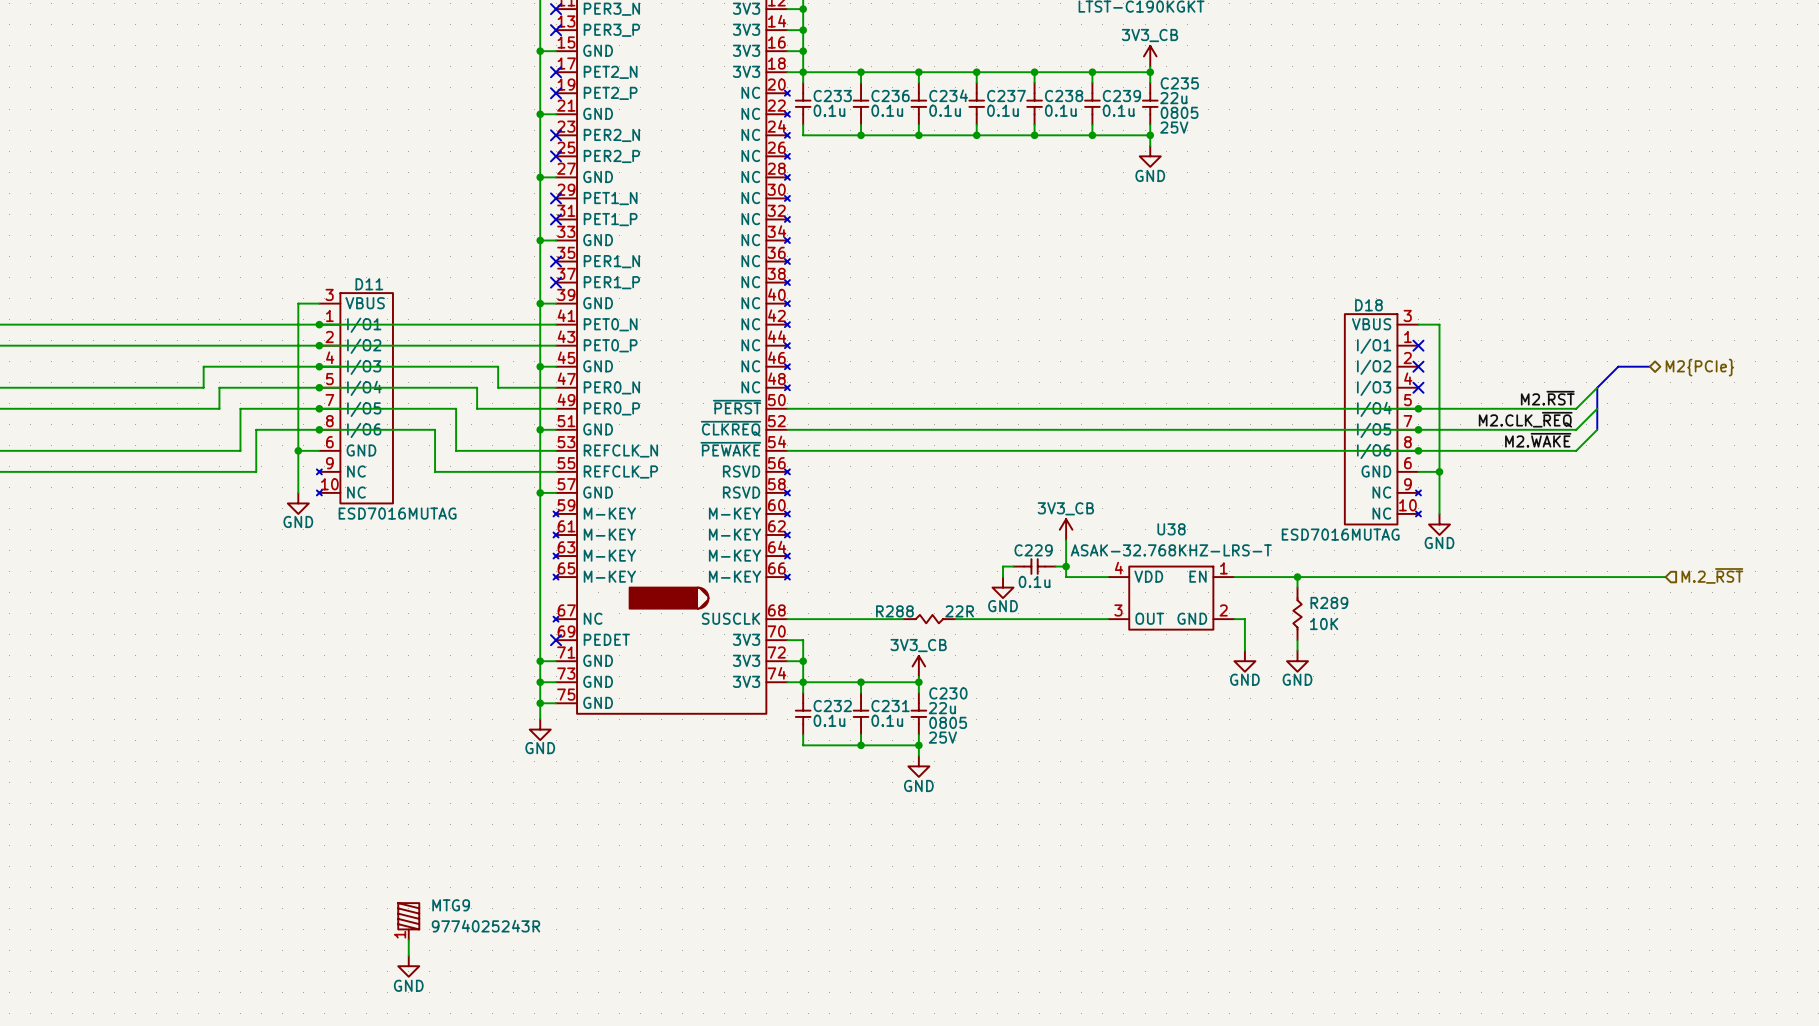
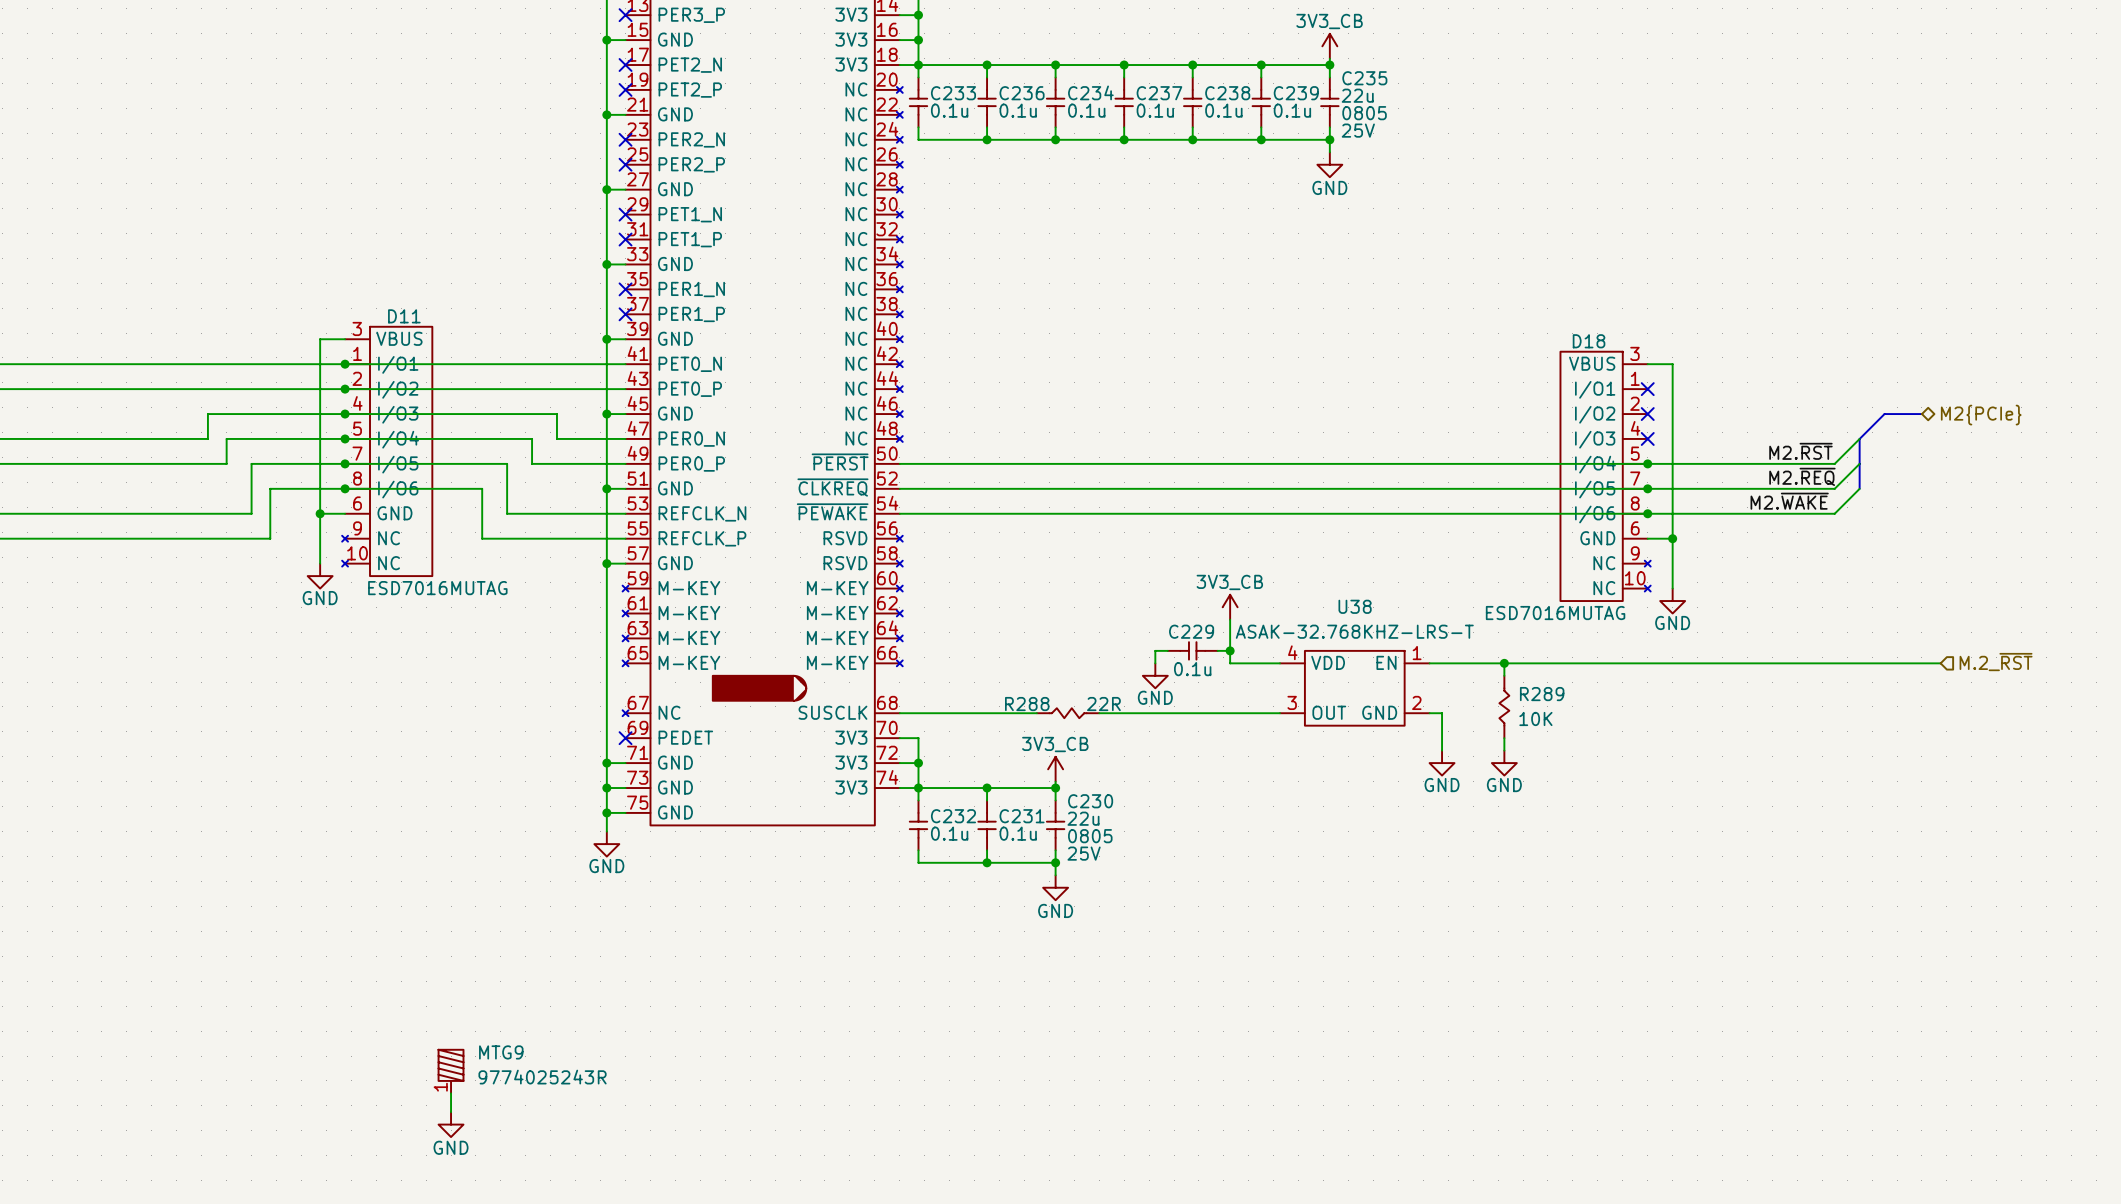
label: M2.CLK_~{REQ} (1525, 419) -> M2.~{REQ} (1802, 476)

